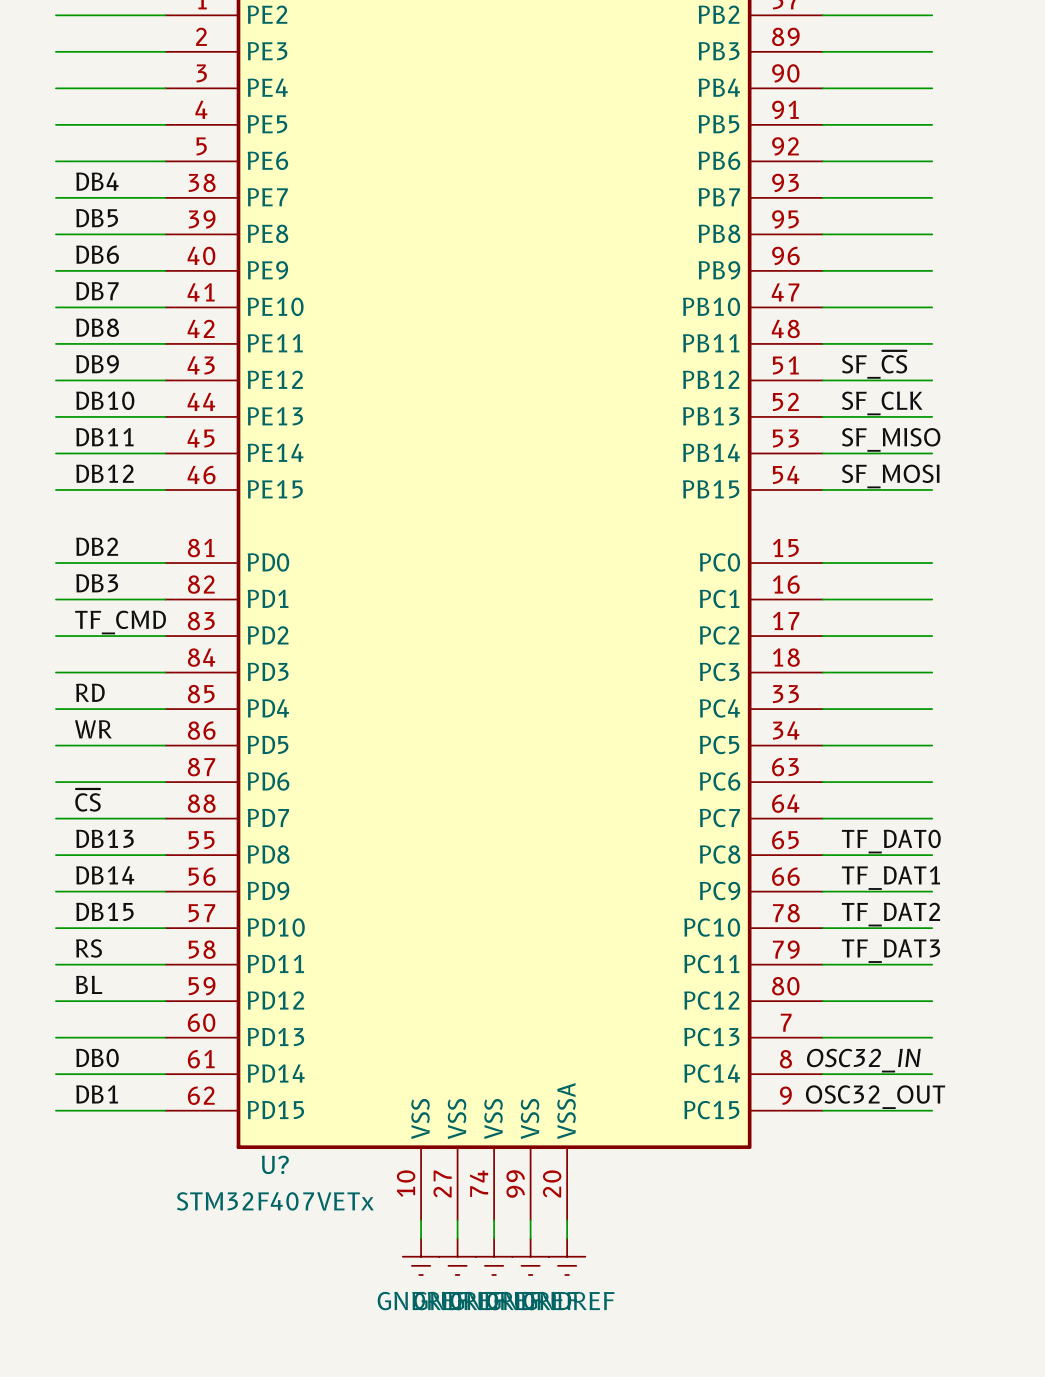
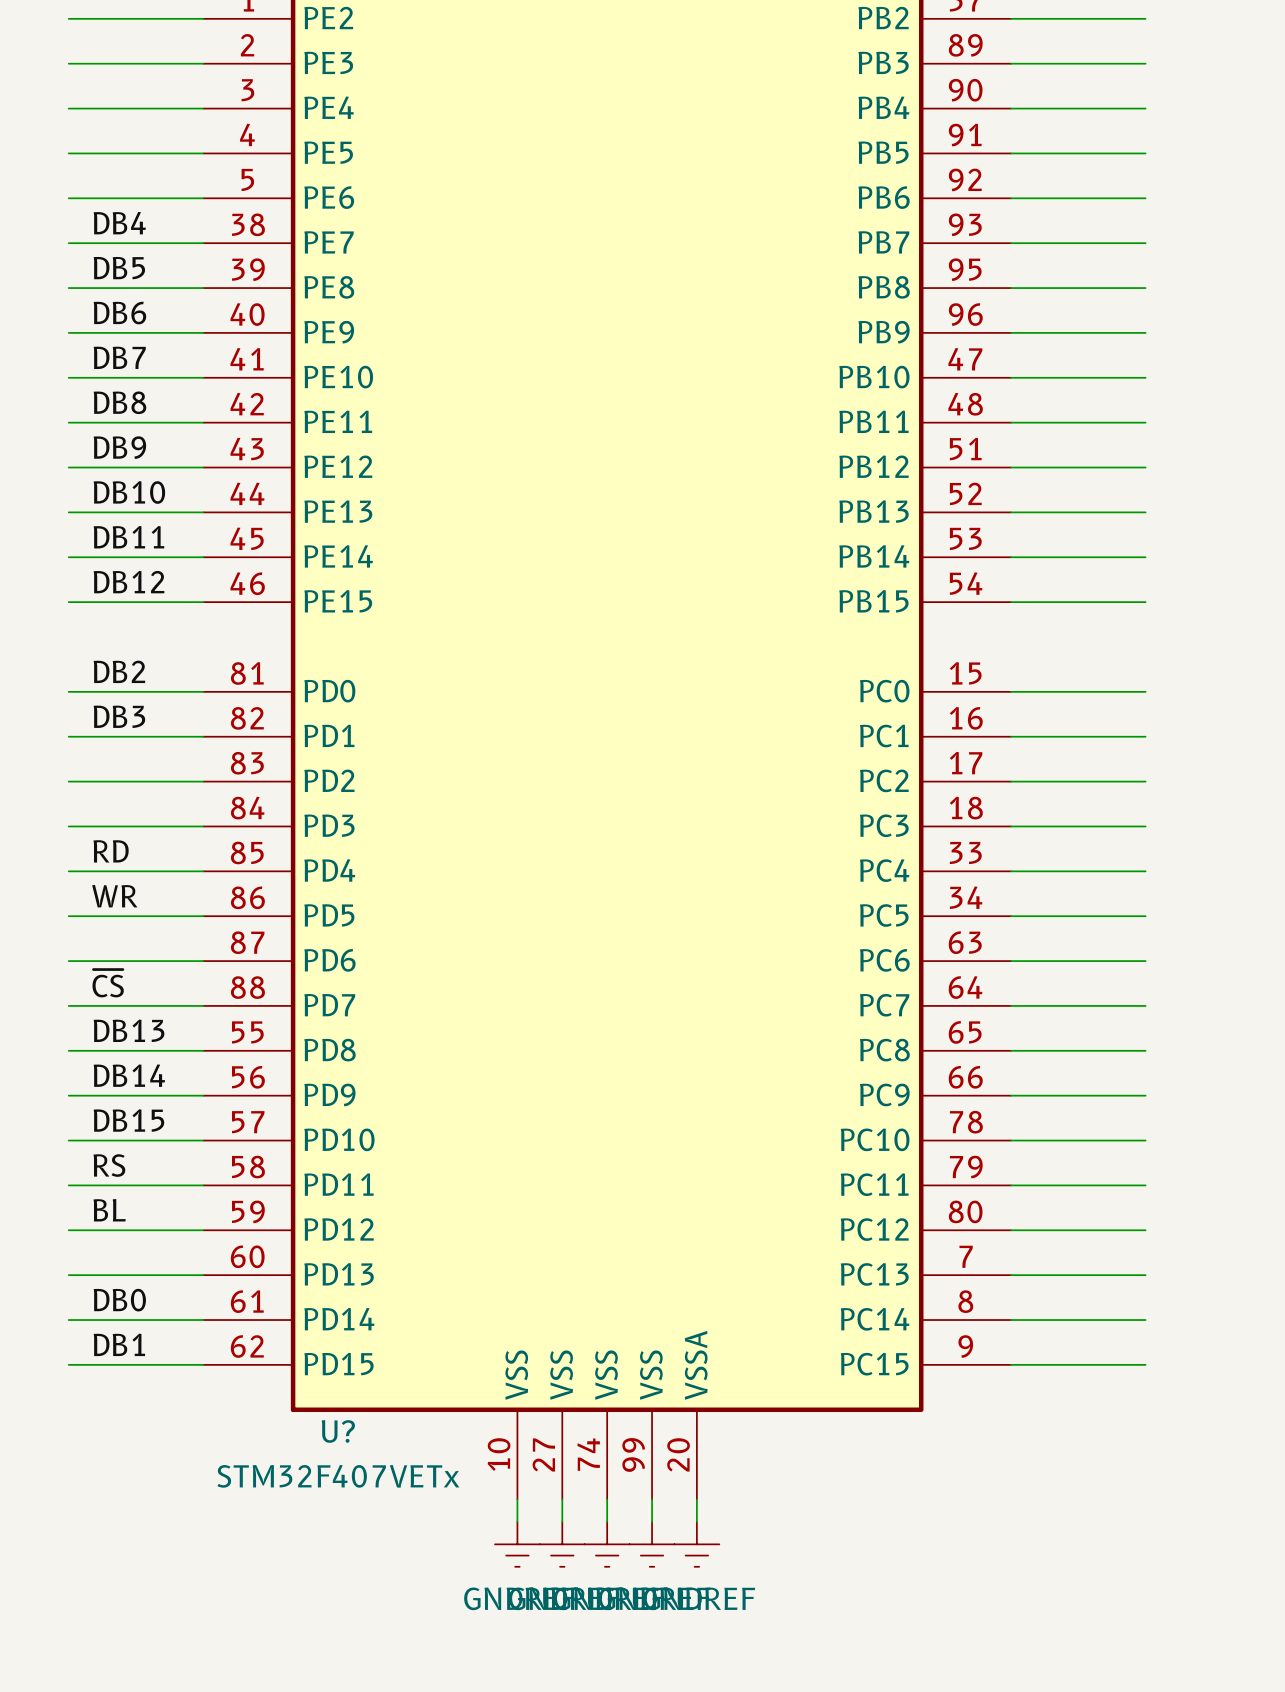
label: SF_~{CS} (874, 364) -> none
label: SF_CLK (882, 403) -> none
label: SF_MISO (891, 439) -> none
label: SF_MOSI (890, 476) -> none
label: TF_CMD (120, 622) -> none
label: TF_DAT0 (891, 841) -> none
label: TF_DAT1 (890, 878) -> none
label: TF_DAT2 (891, 914) -> none
label: TF_DAT3 (891, 951) -> none
label: OSC32_IN (863, 1060) -> none
label: OSC32_OUT (875, 1097) -> none

